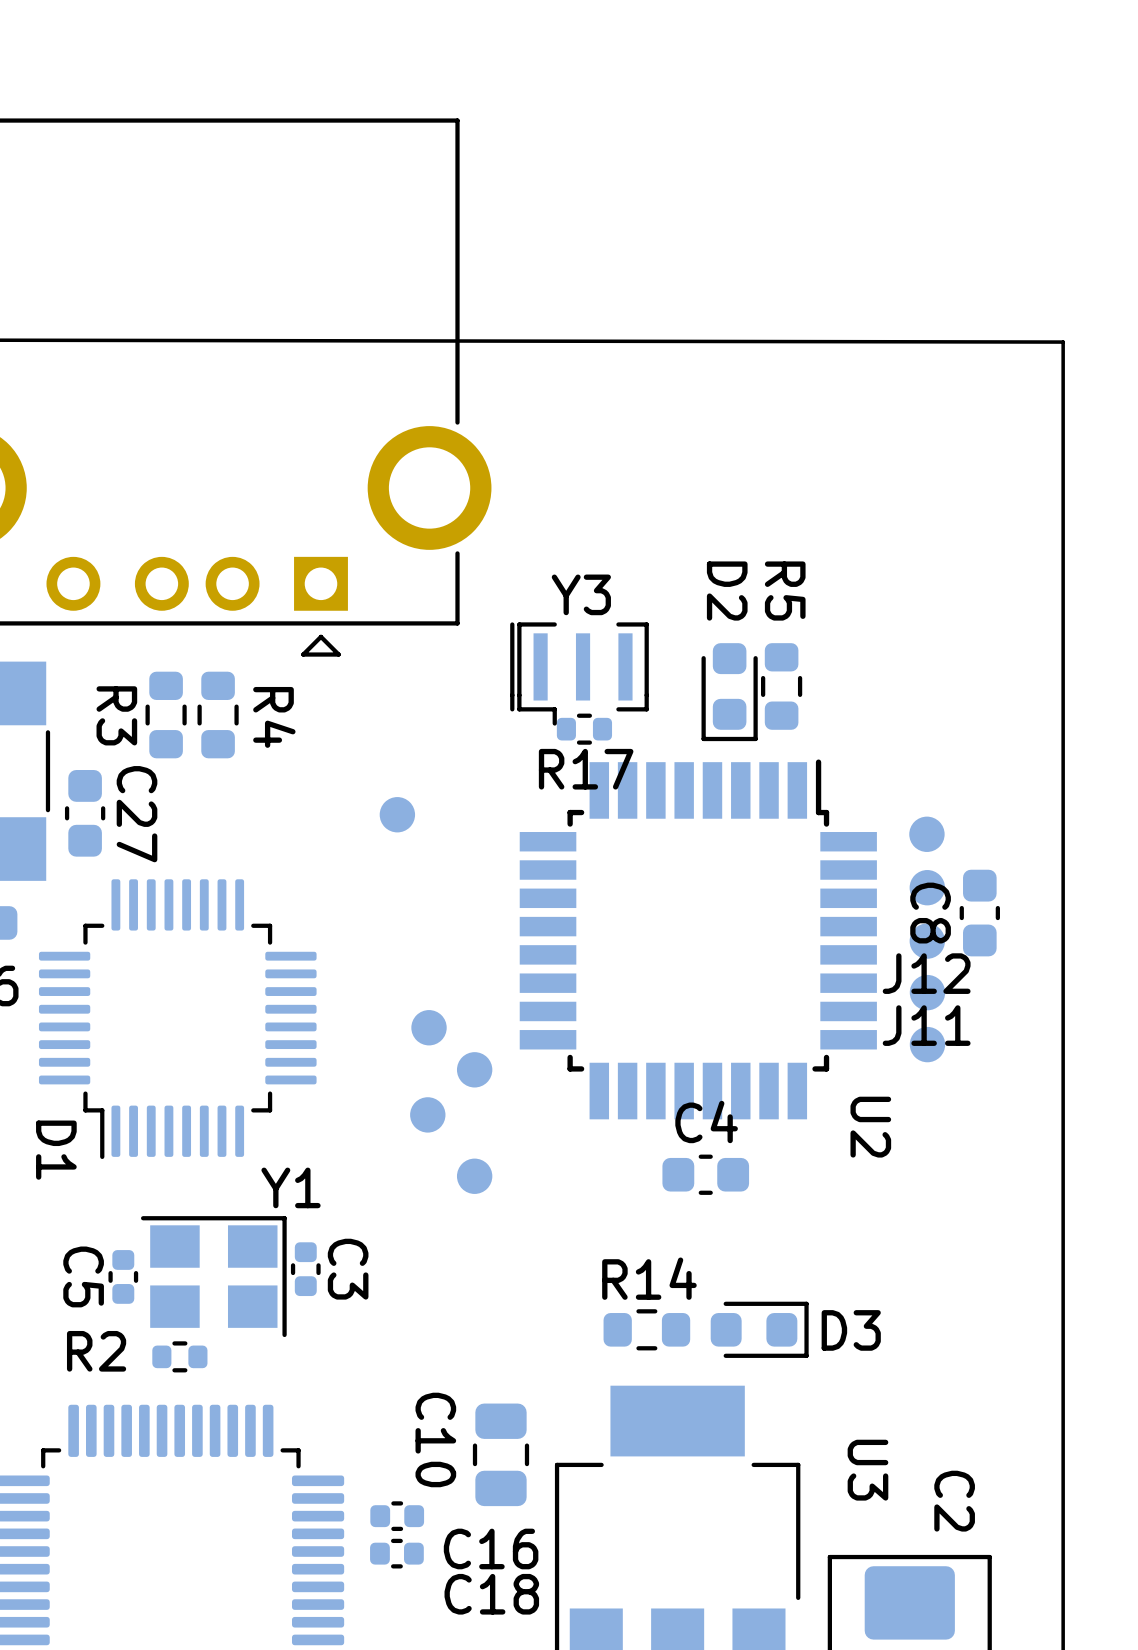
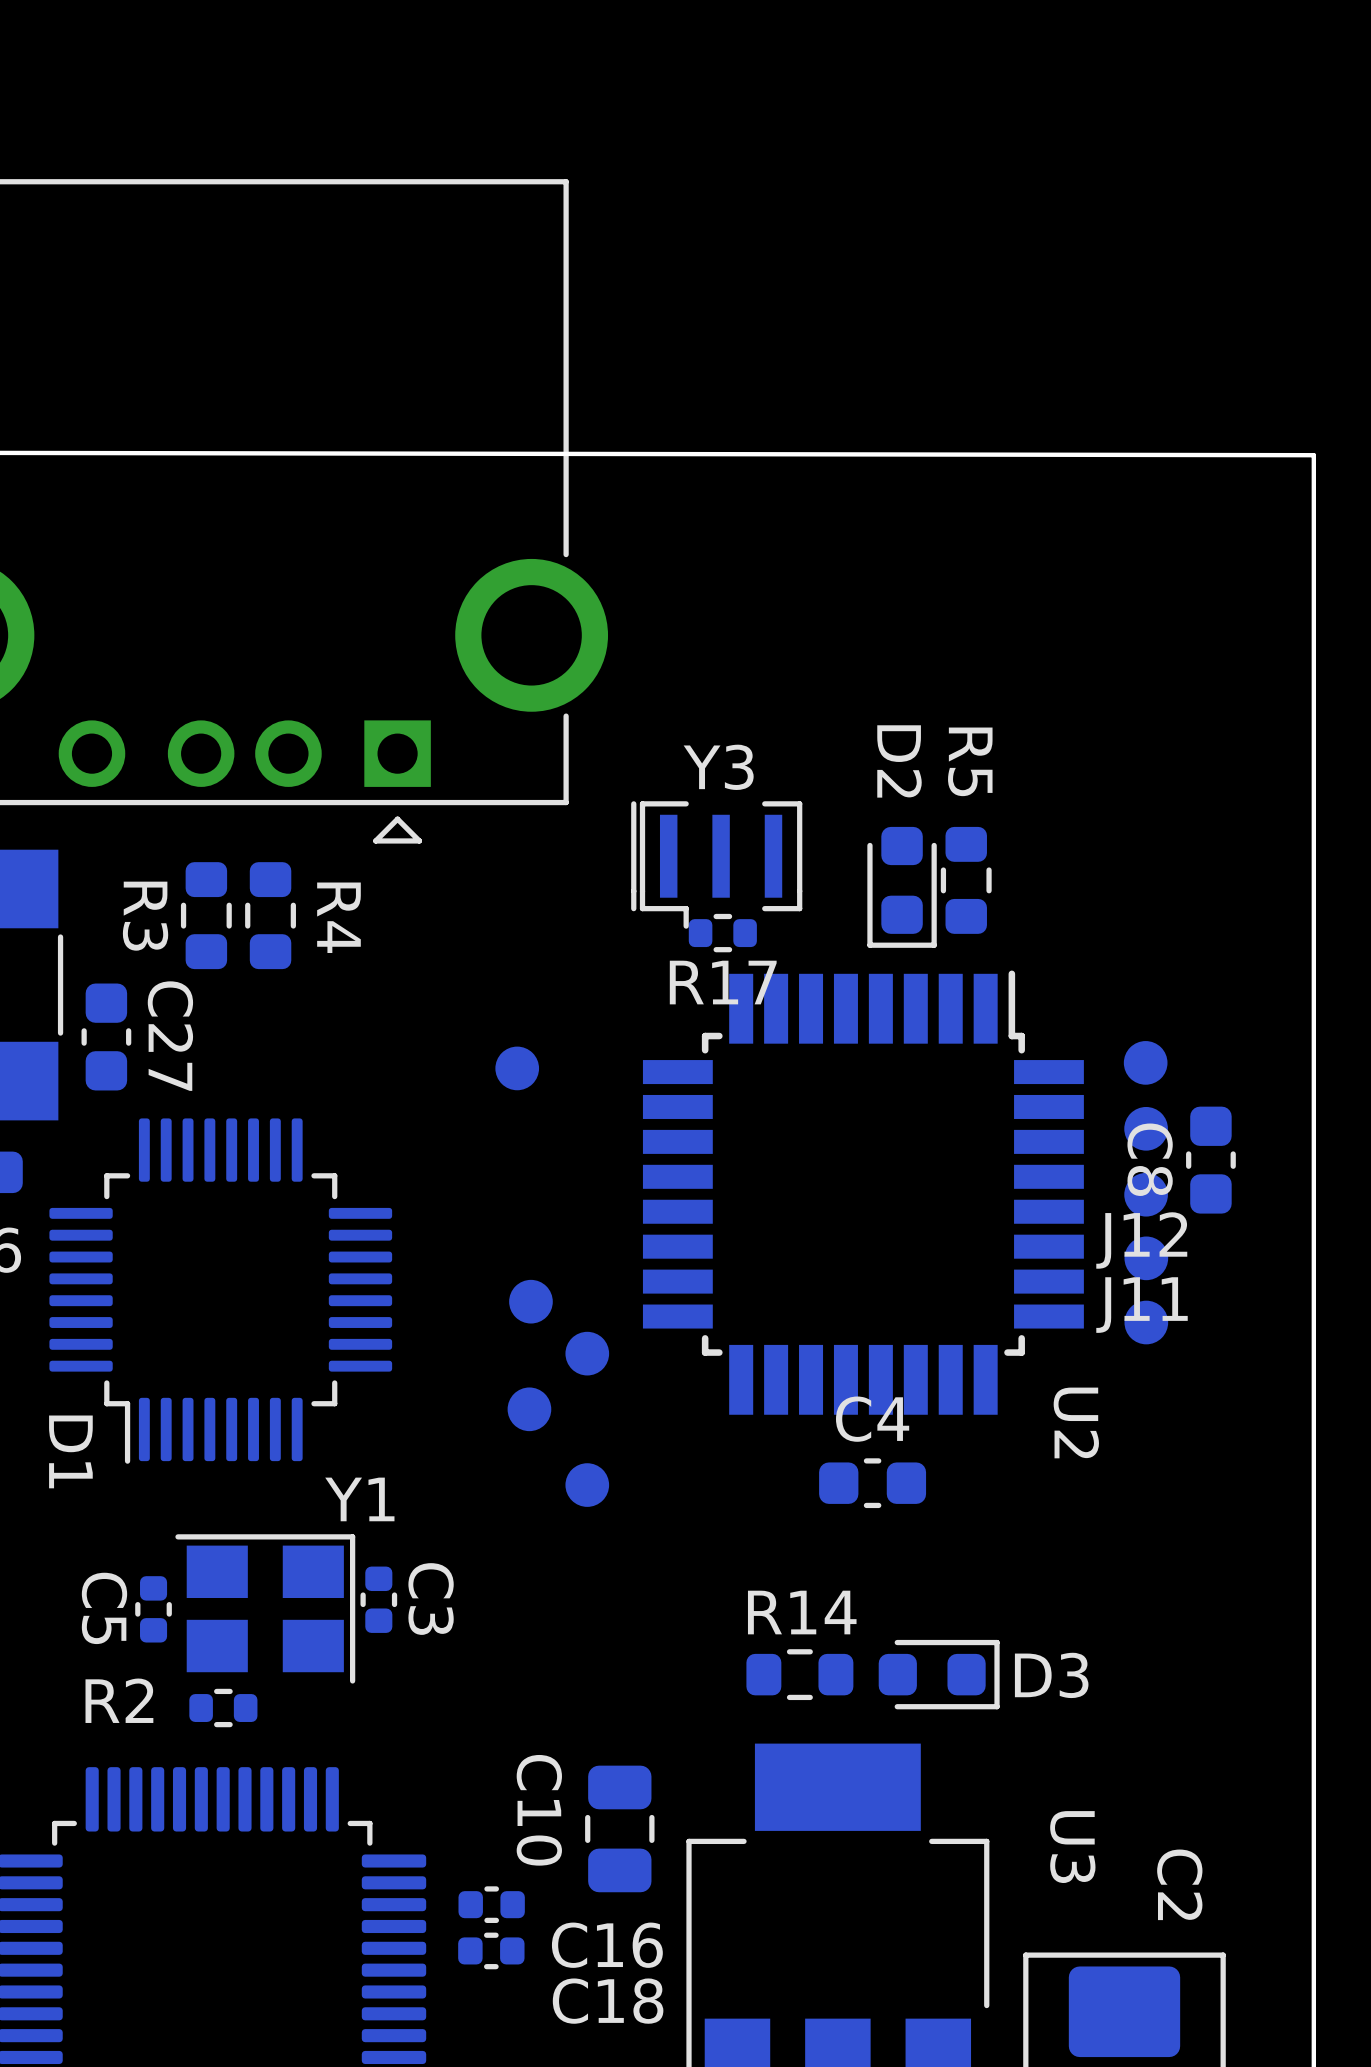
part position: (397, 814) -> (517, 1068)

